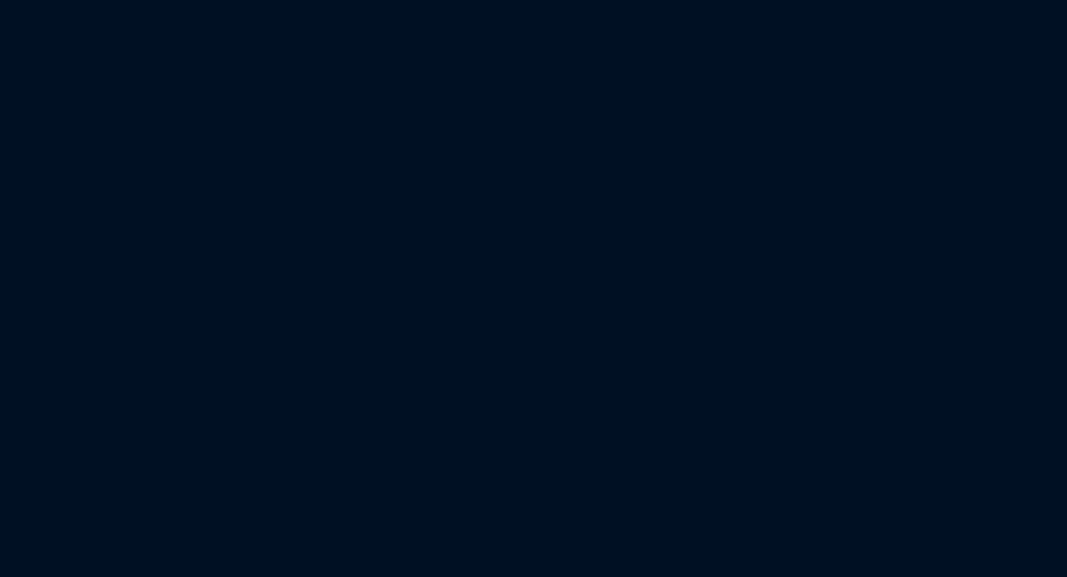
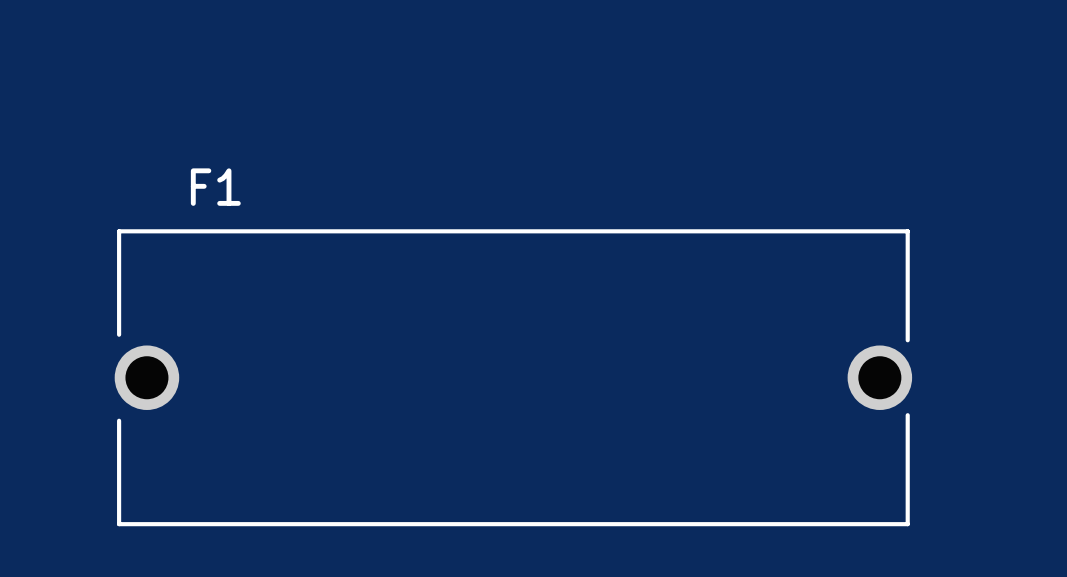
F1: none -> (513, 377)

